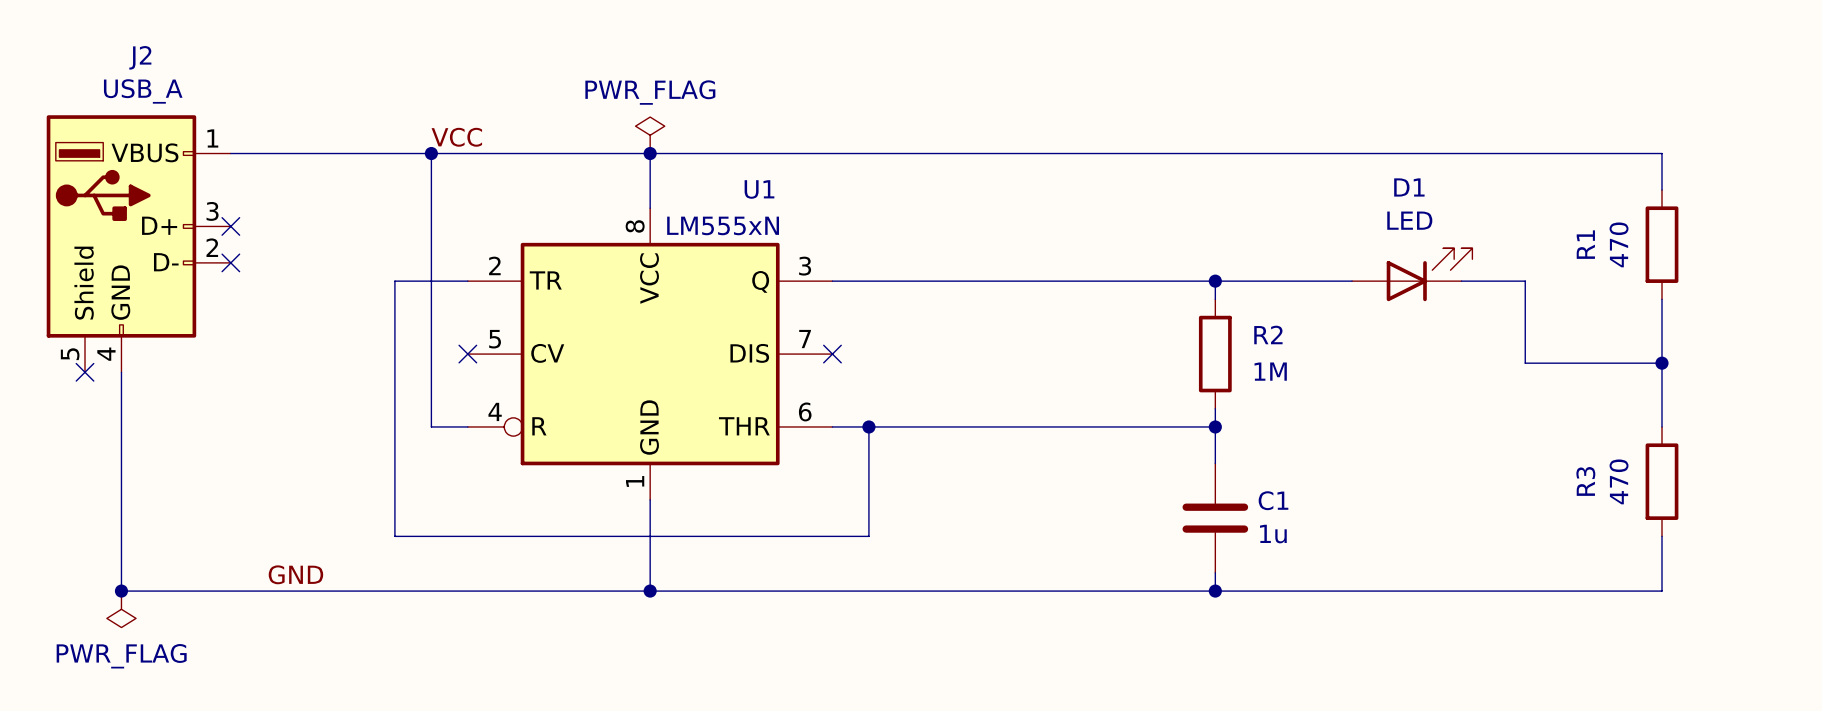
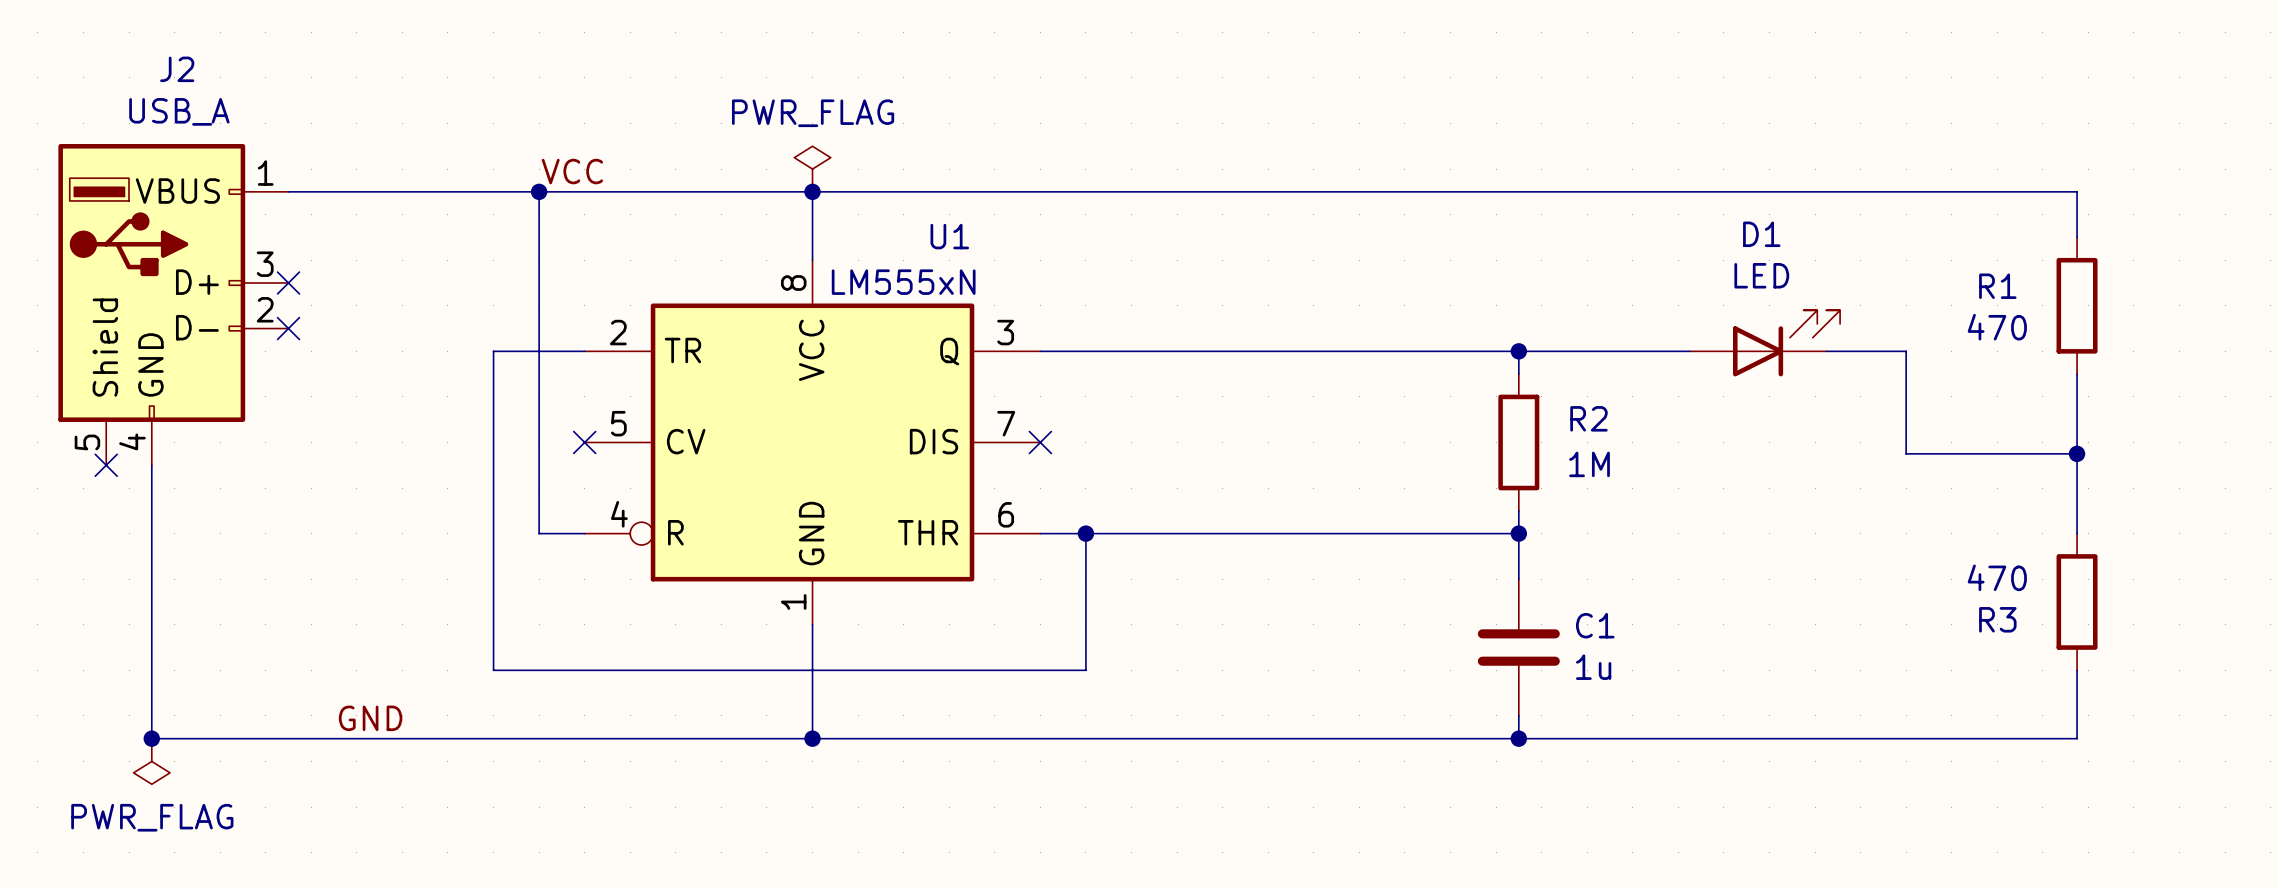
R1 name rotation: 0° (1585, 244) -> 90° clockwise (1997, 286)
R1 value rotation: 0° (1619, 244) -> 90° clockwise (1997, 327)
R3 name rotation: 0° (1585, 481) -> 90° clockwise (1997, 619)
R3 value rotation: 0° (1619, 481) -> 90° clockwise (1997, 577)

